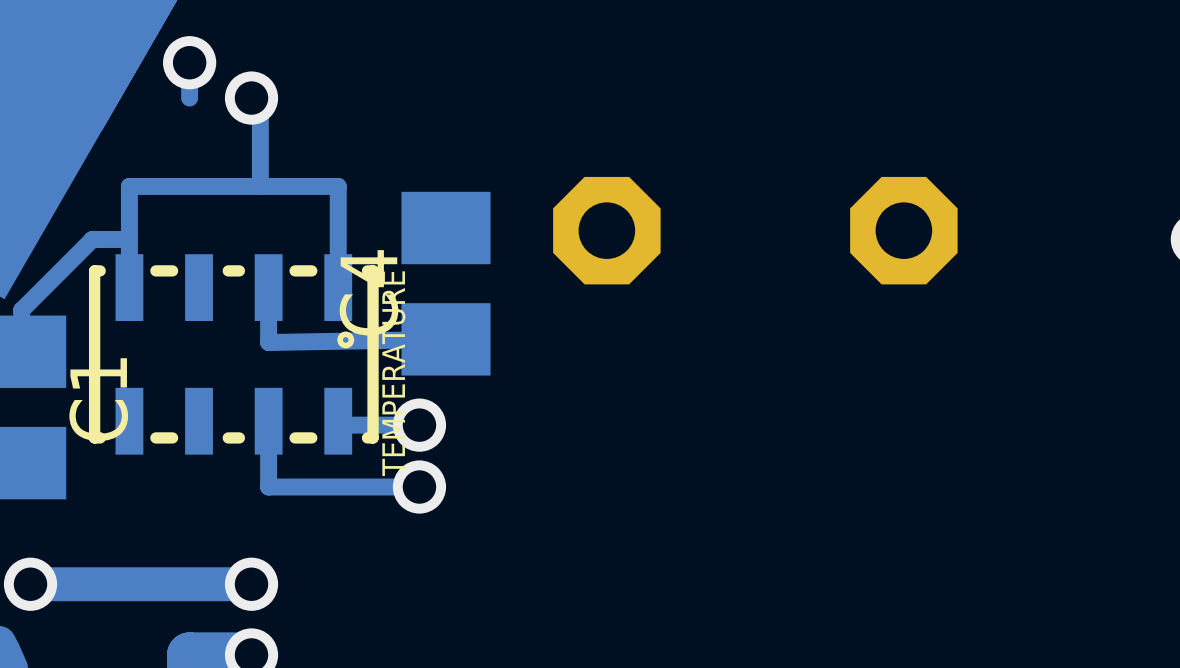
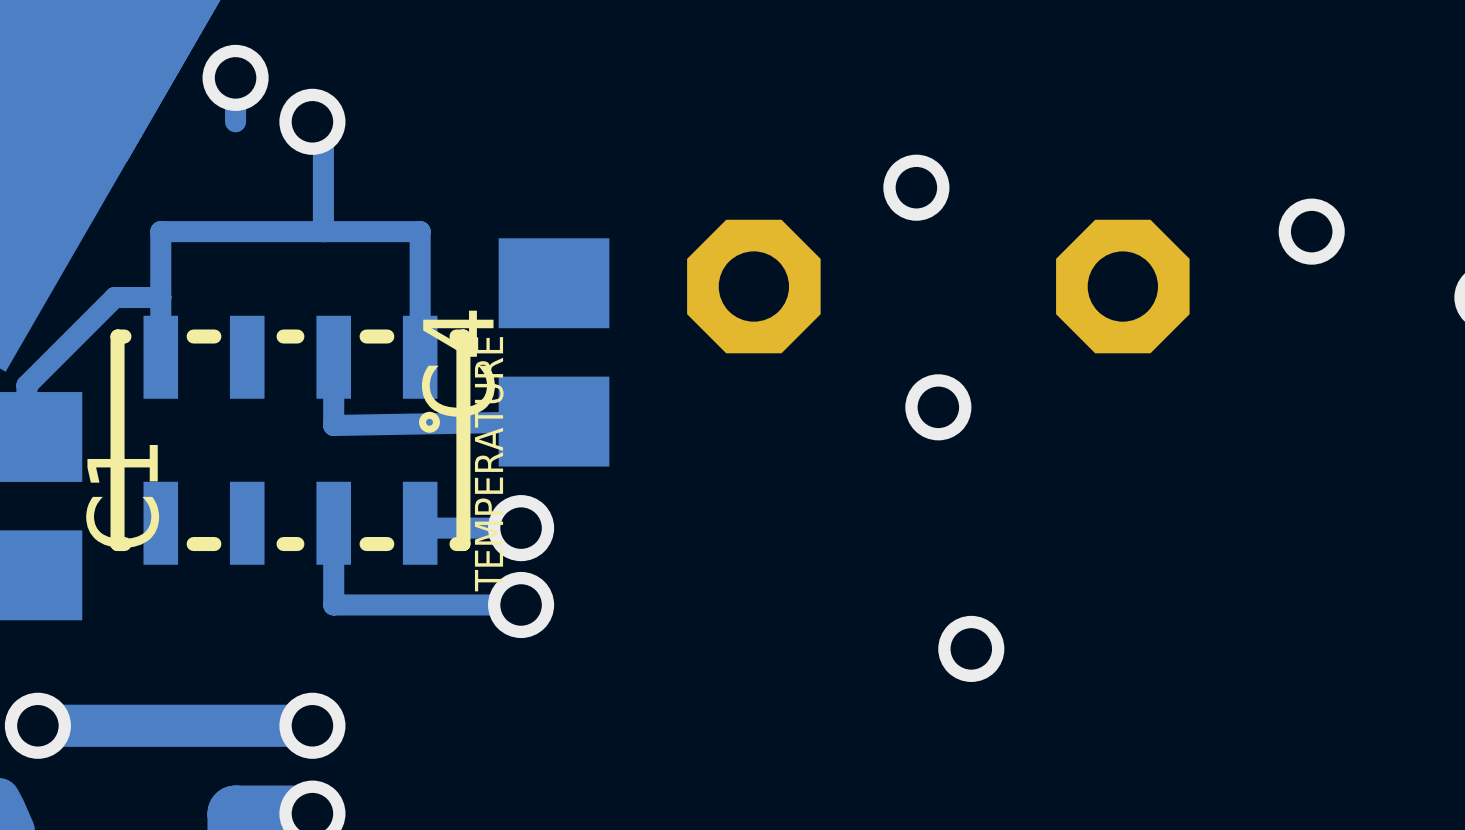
via: none -> (916, 187)
via: none -> (1311, 231)
via: none -> (938, 407)
via: none -> (971, 648)

